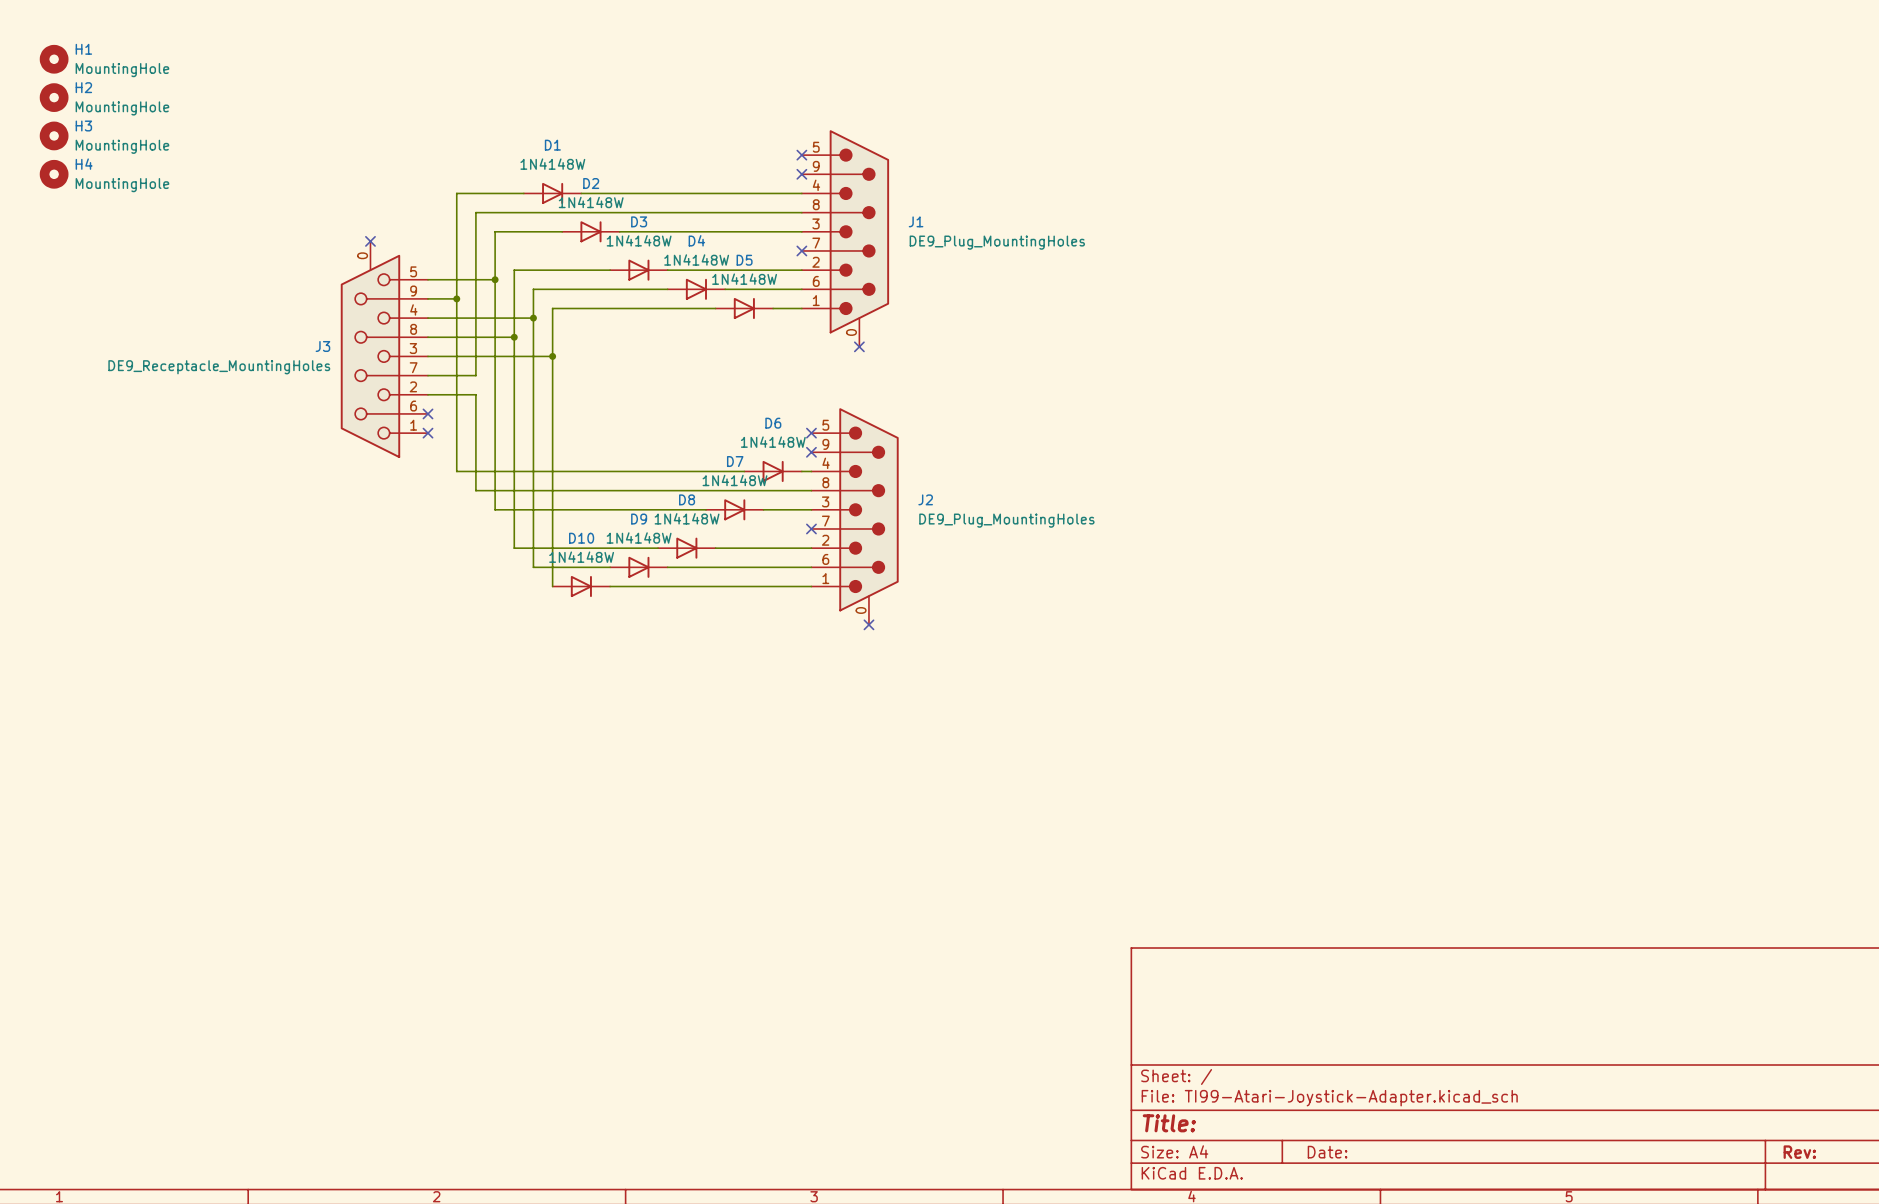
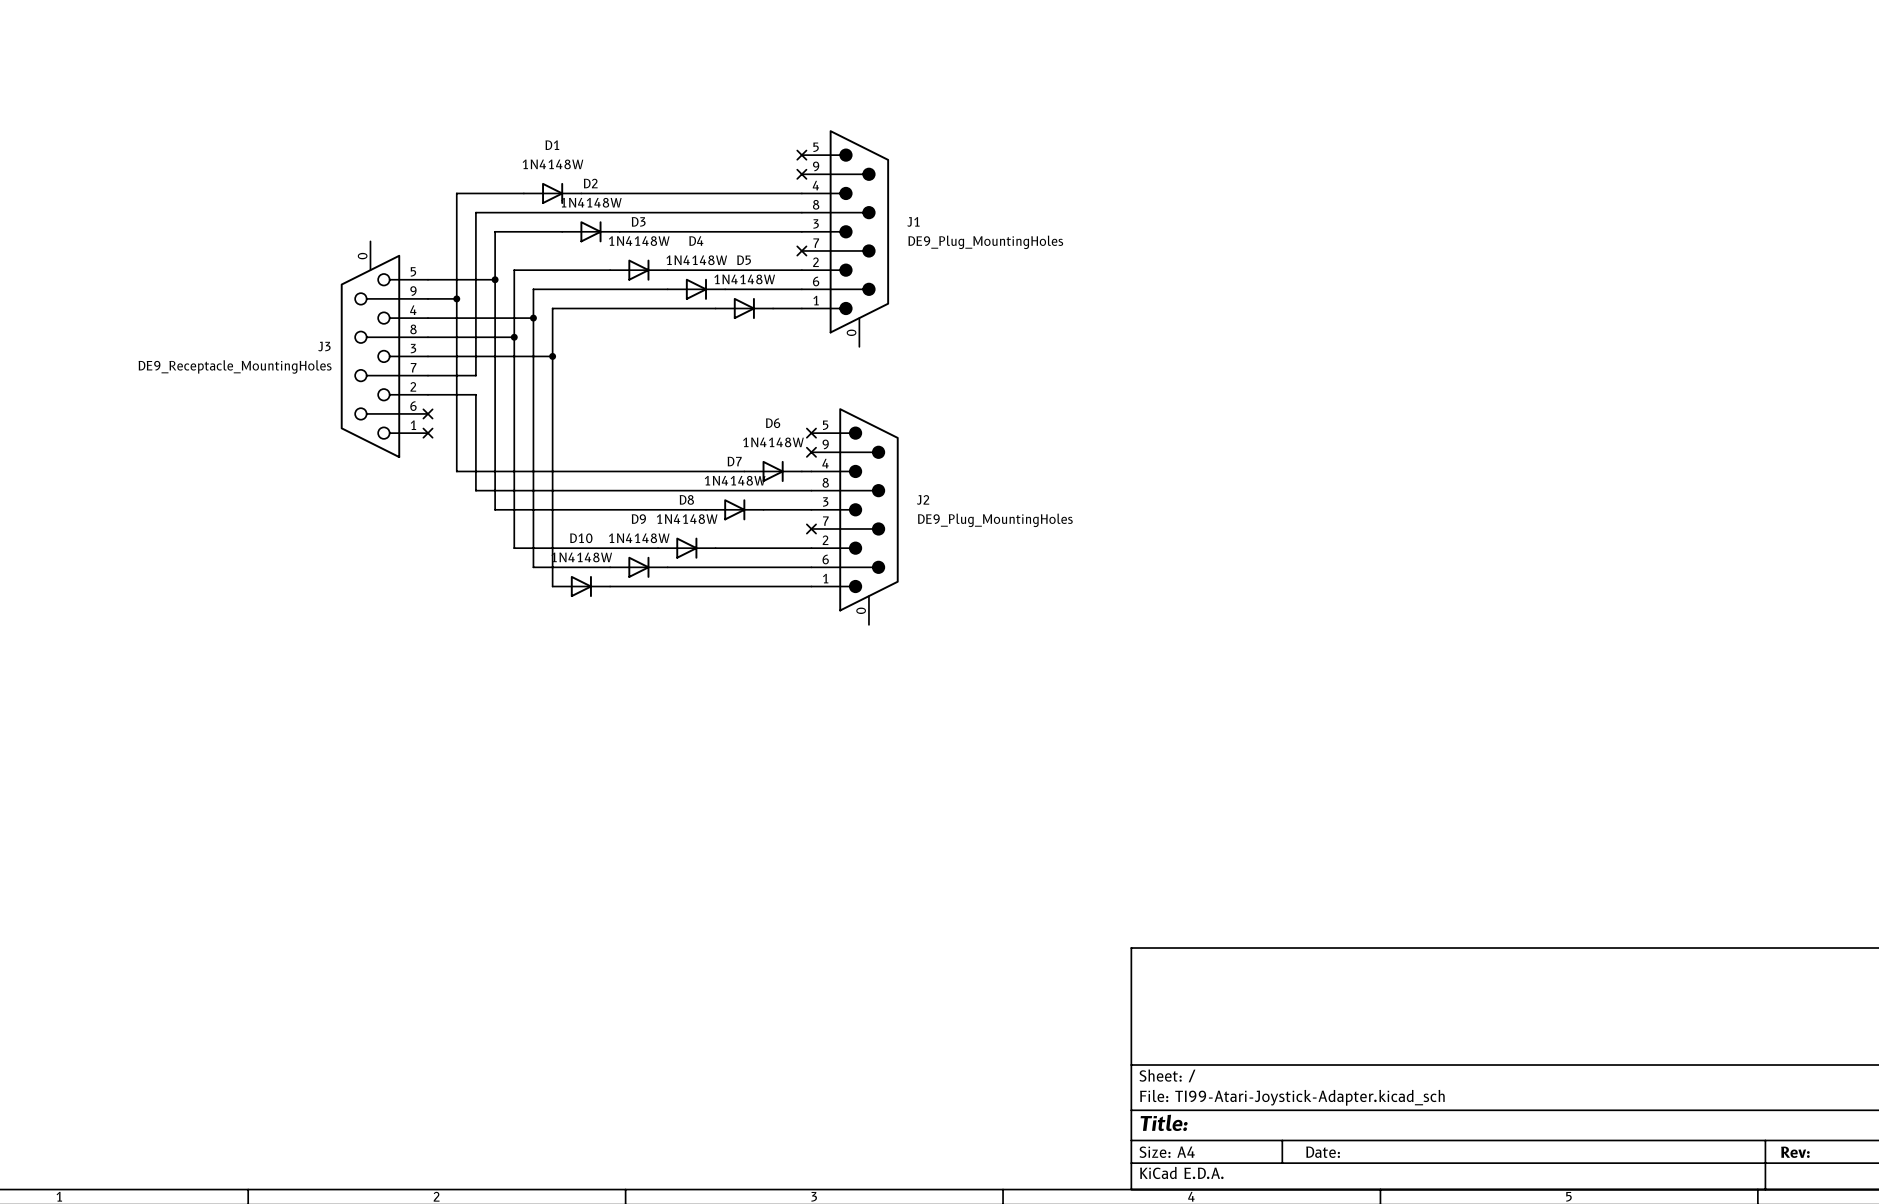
H1: MountingHole (54, 59) -> none
H2: MountingHole (54, 97) -> none
H3: MountingHole (54, 135) -> none
H4: MountingHole (54, 174) -> none
no-connect mark: (370, 241) -> none
no-connect mark: (859, 346) -> none
no-connect mark: (868, 624) -> none

